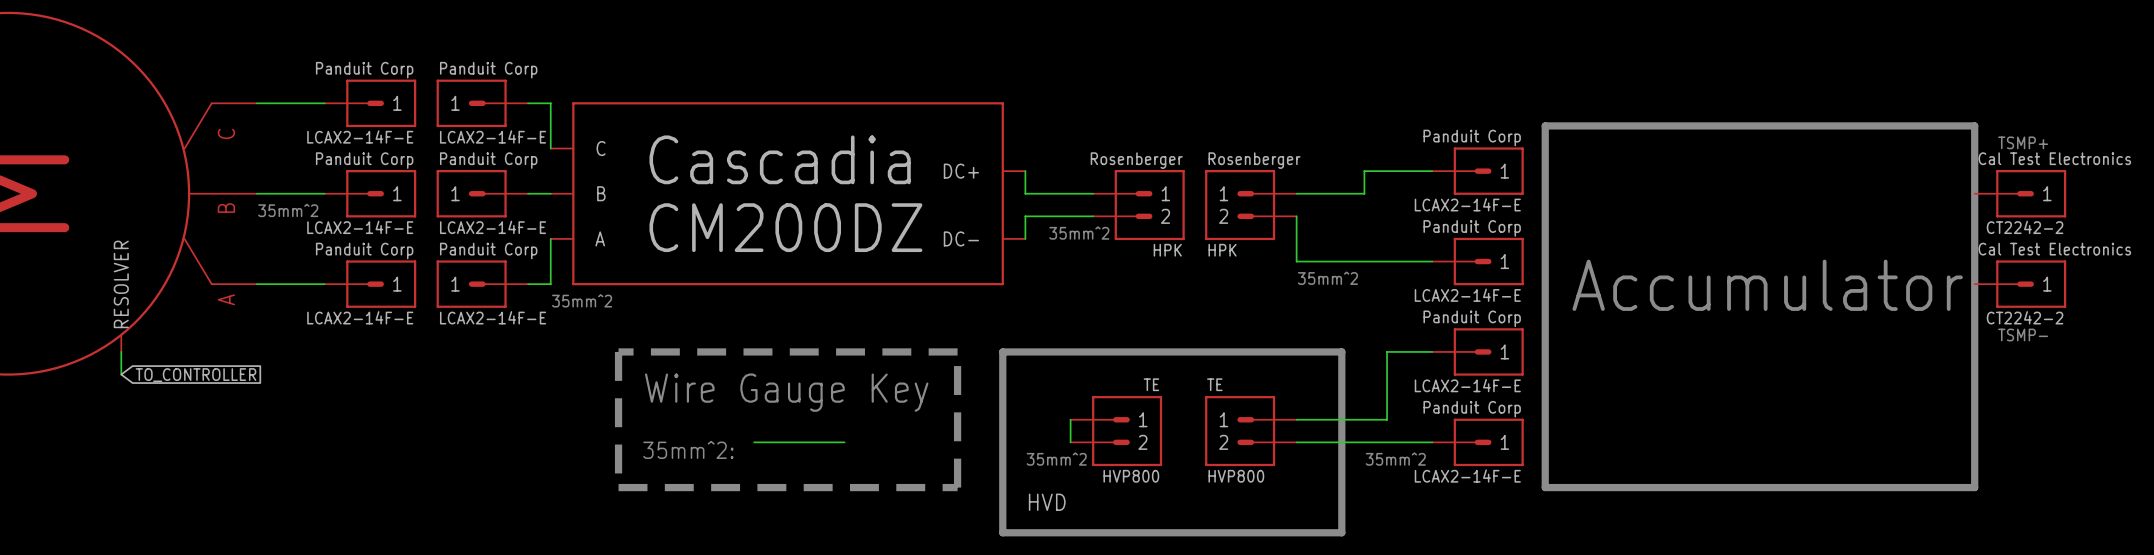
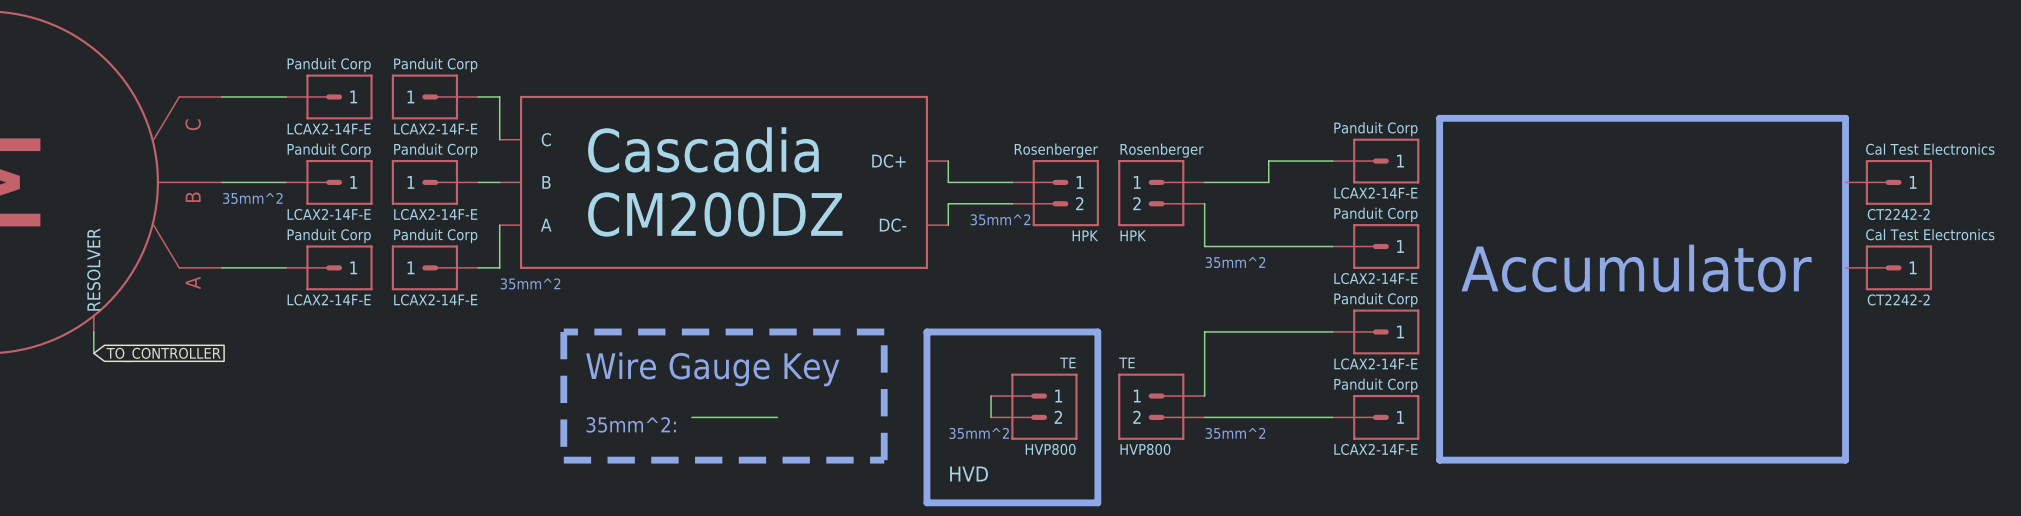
text: TSMP+ (2023, 142) -> none
text: TSMP- (2023, 335) -> none
line: (1183, 351) (1341, 351) (1341, 532) (1183, 532) -> (1097, 331) (1097, 502)
wire: (1387, 351) (1387, 419) (1296, 419) -> (1290, 331) (1204, 331) (1204, 396)
text position: 35mm^2 (1395, 459) -> 35mm^2 (1235, 433)

